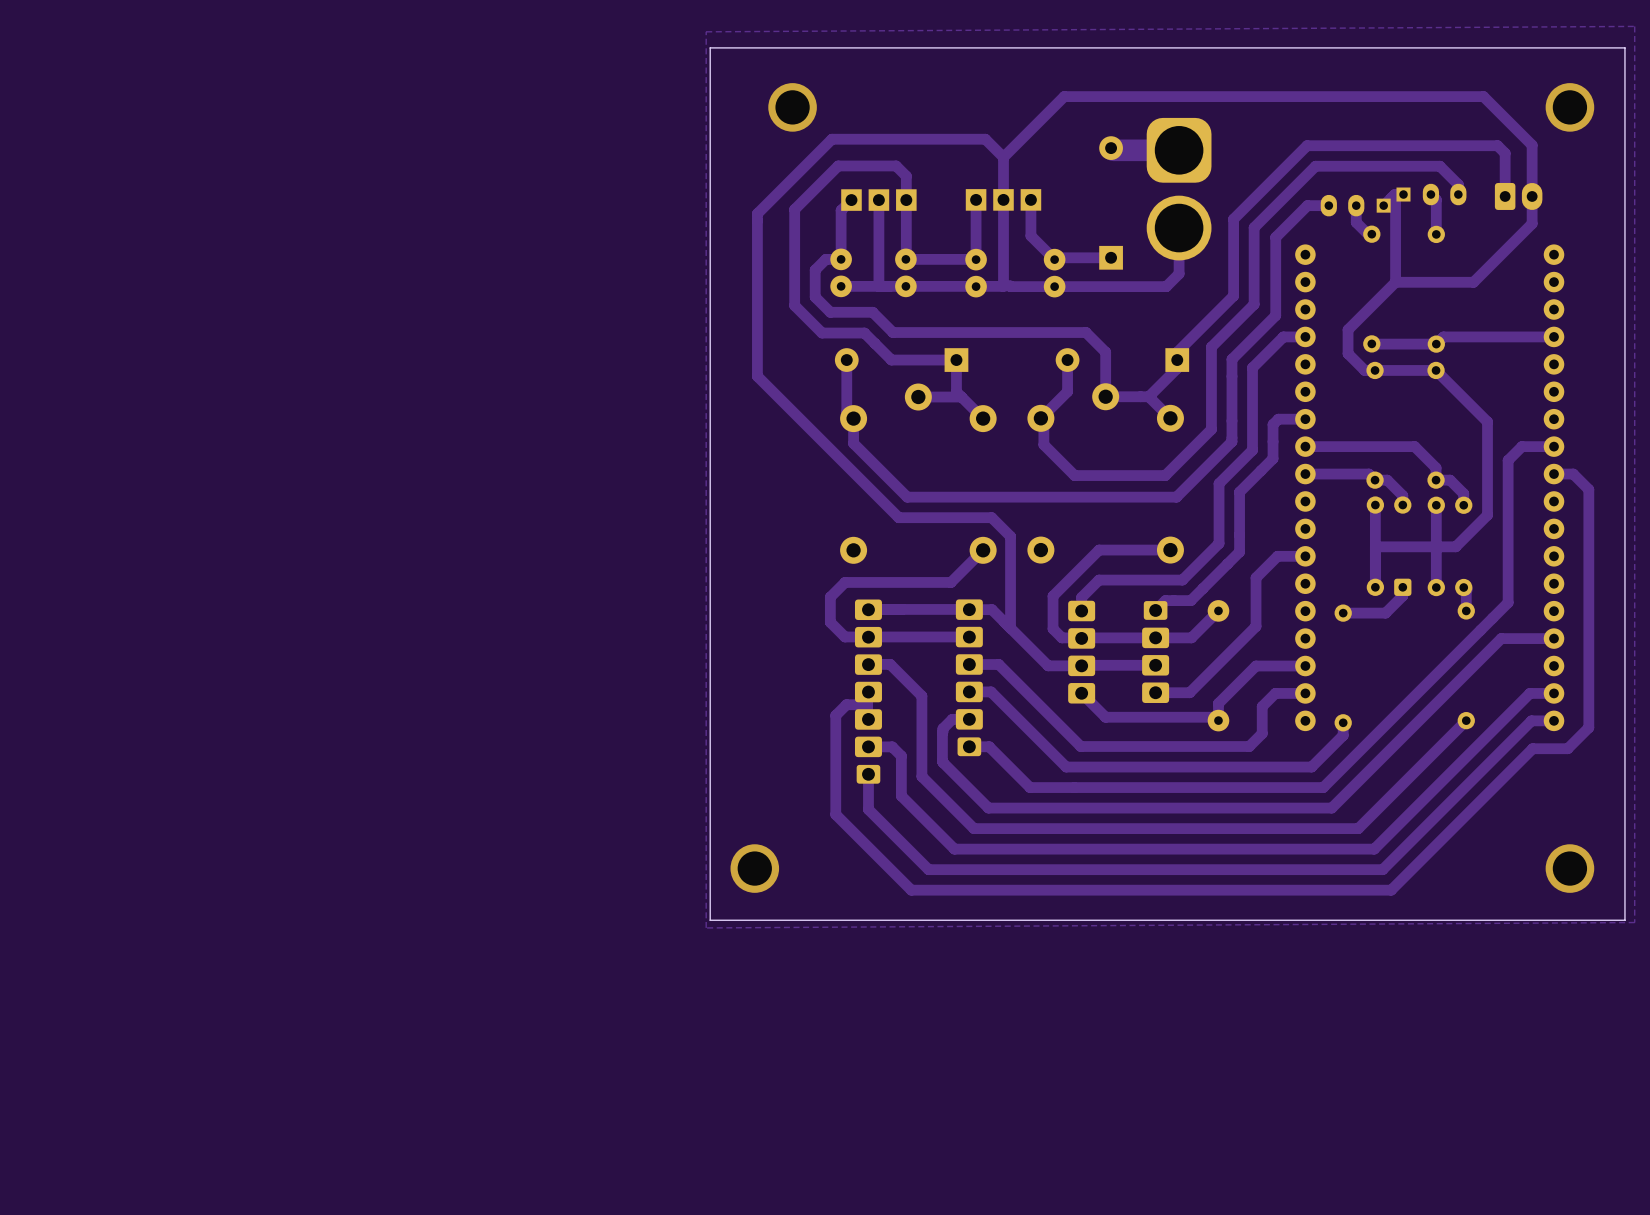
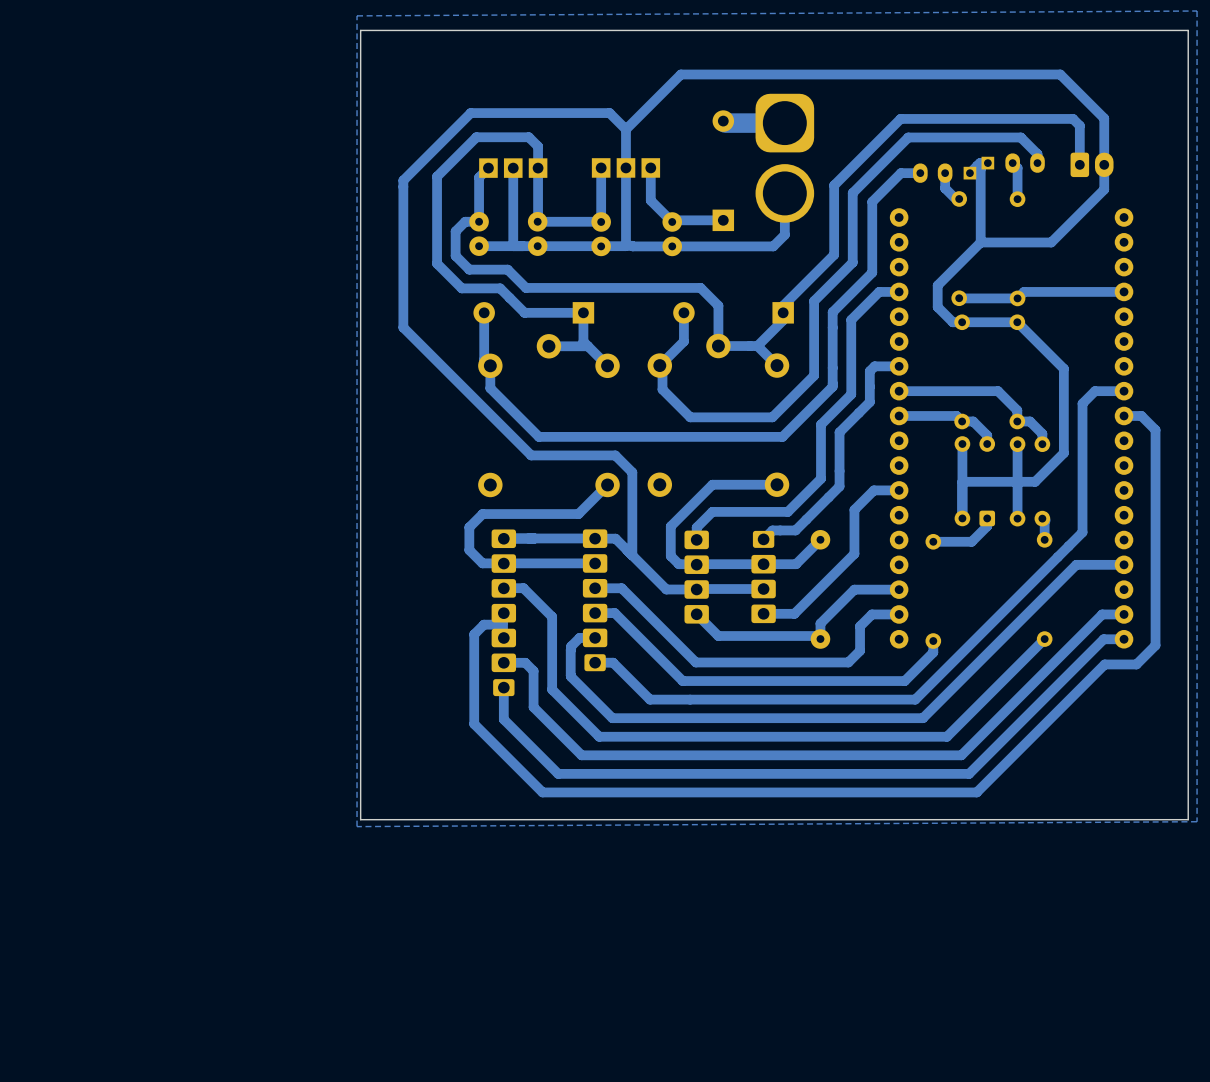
via: (792, 107) -> none
via: (1569, 107) -> none
via: (754, 868) -> none
via: (1569, 868) -> none

